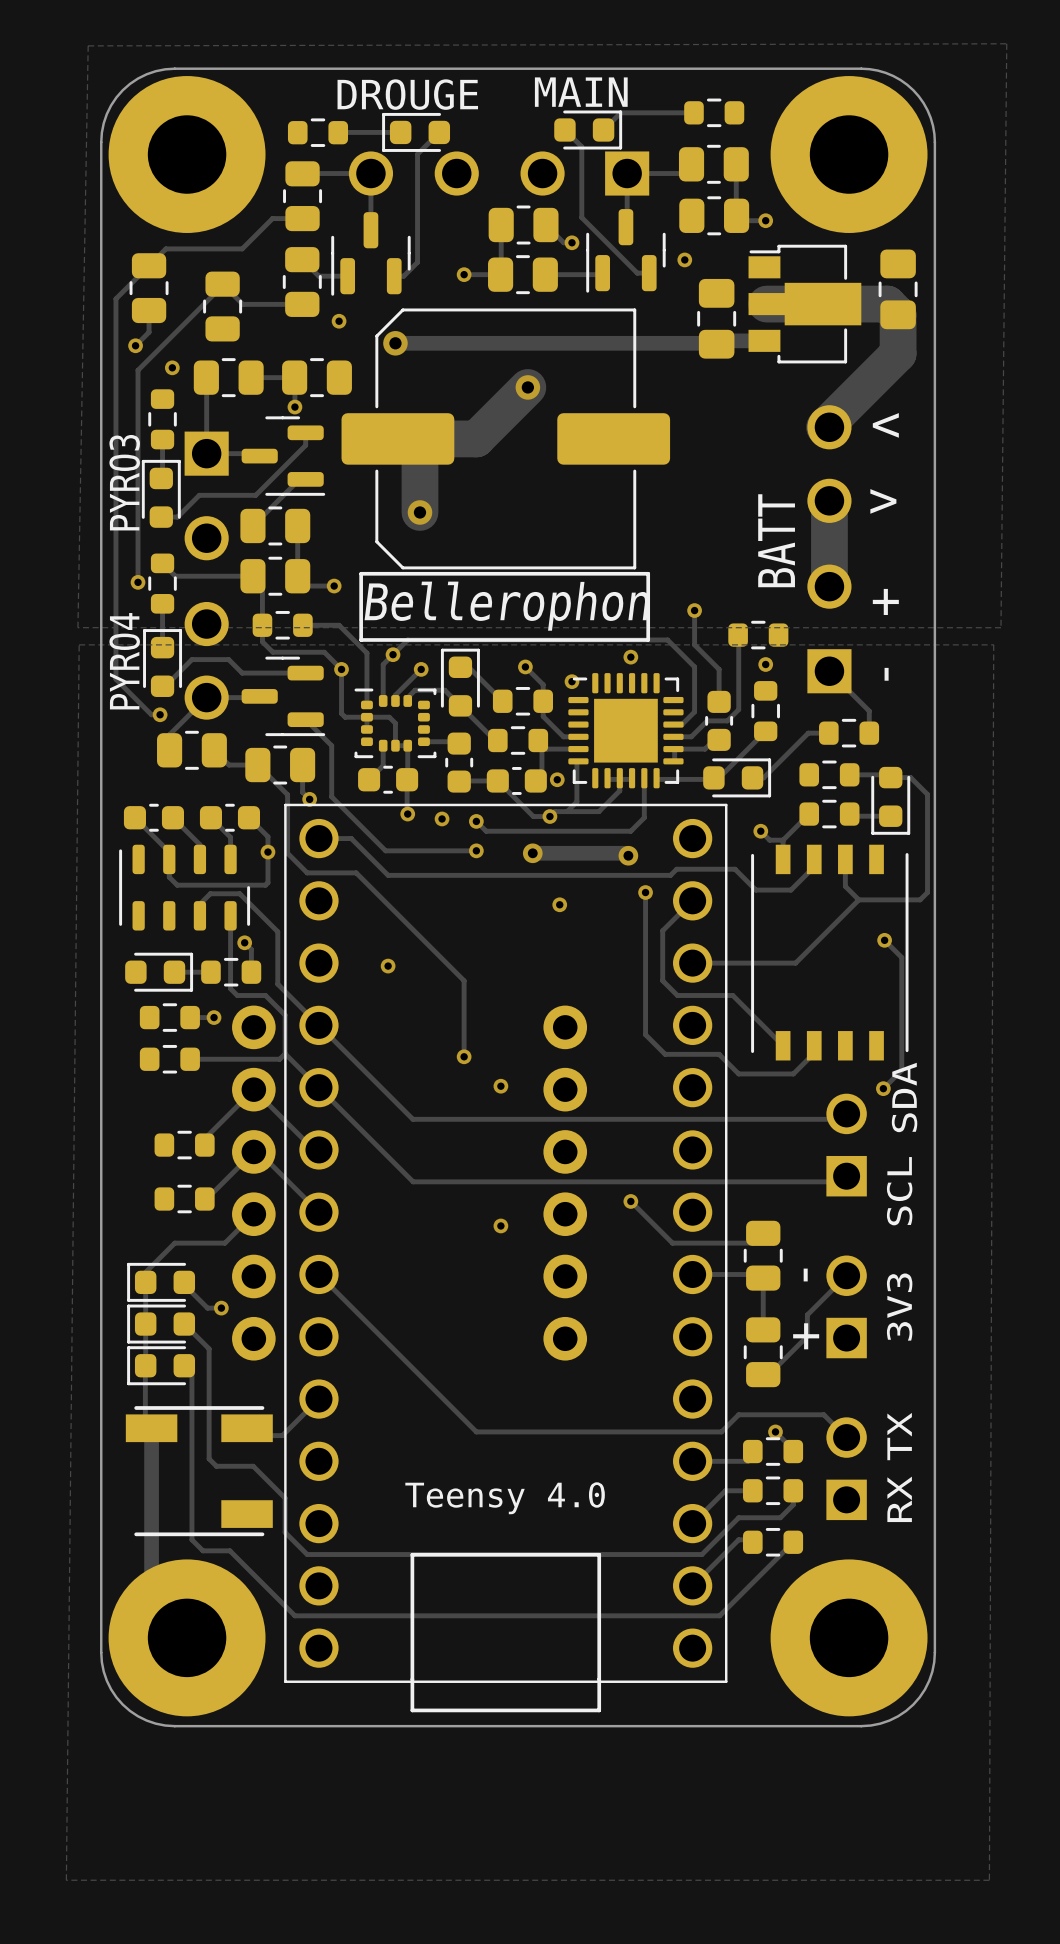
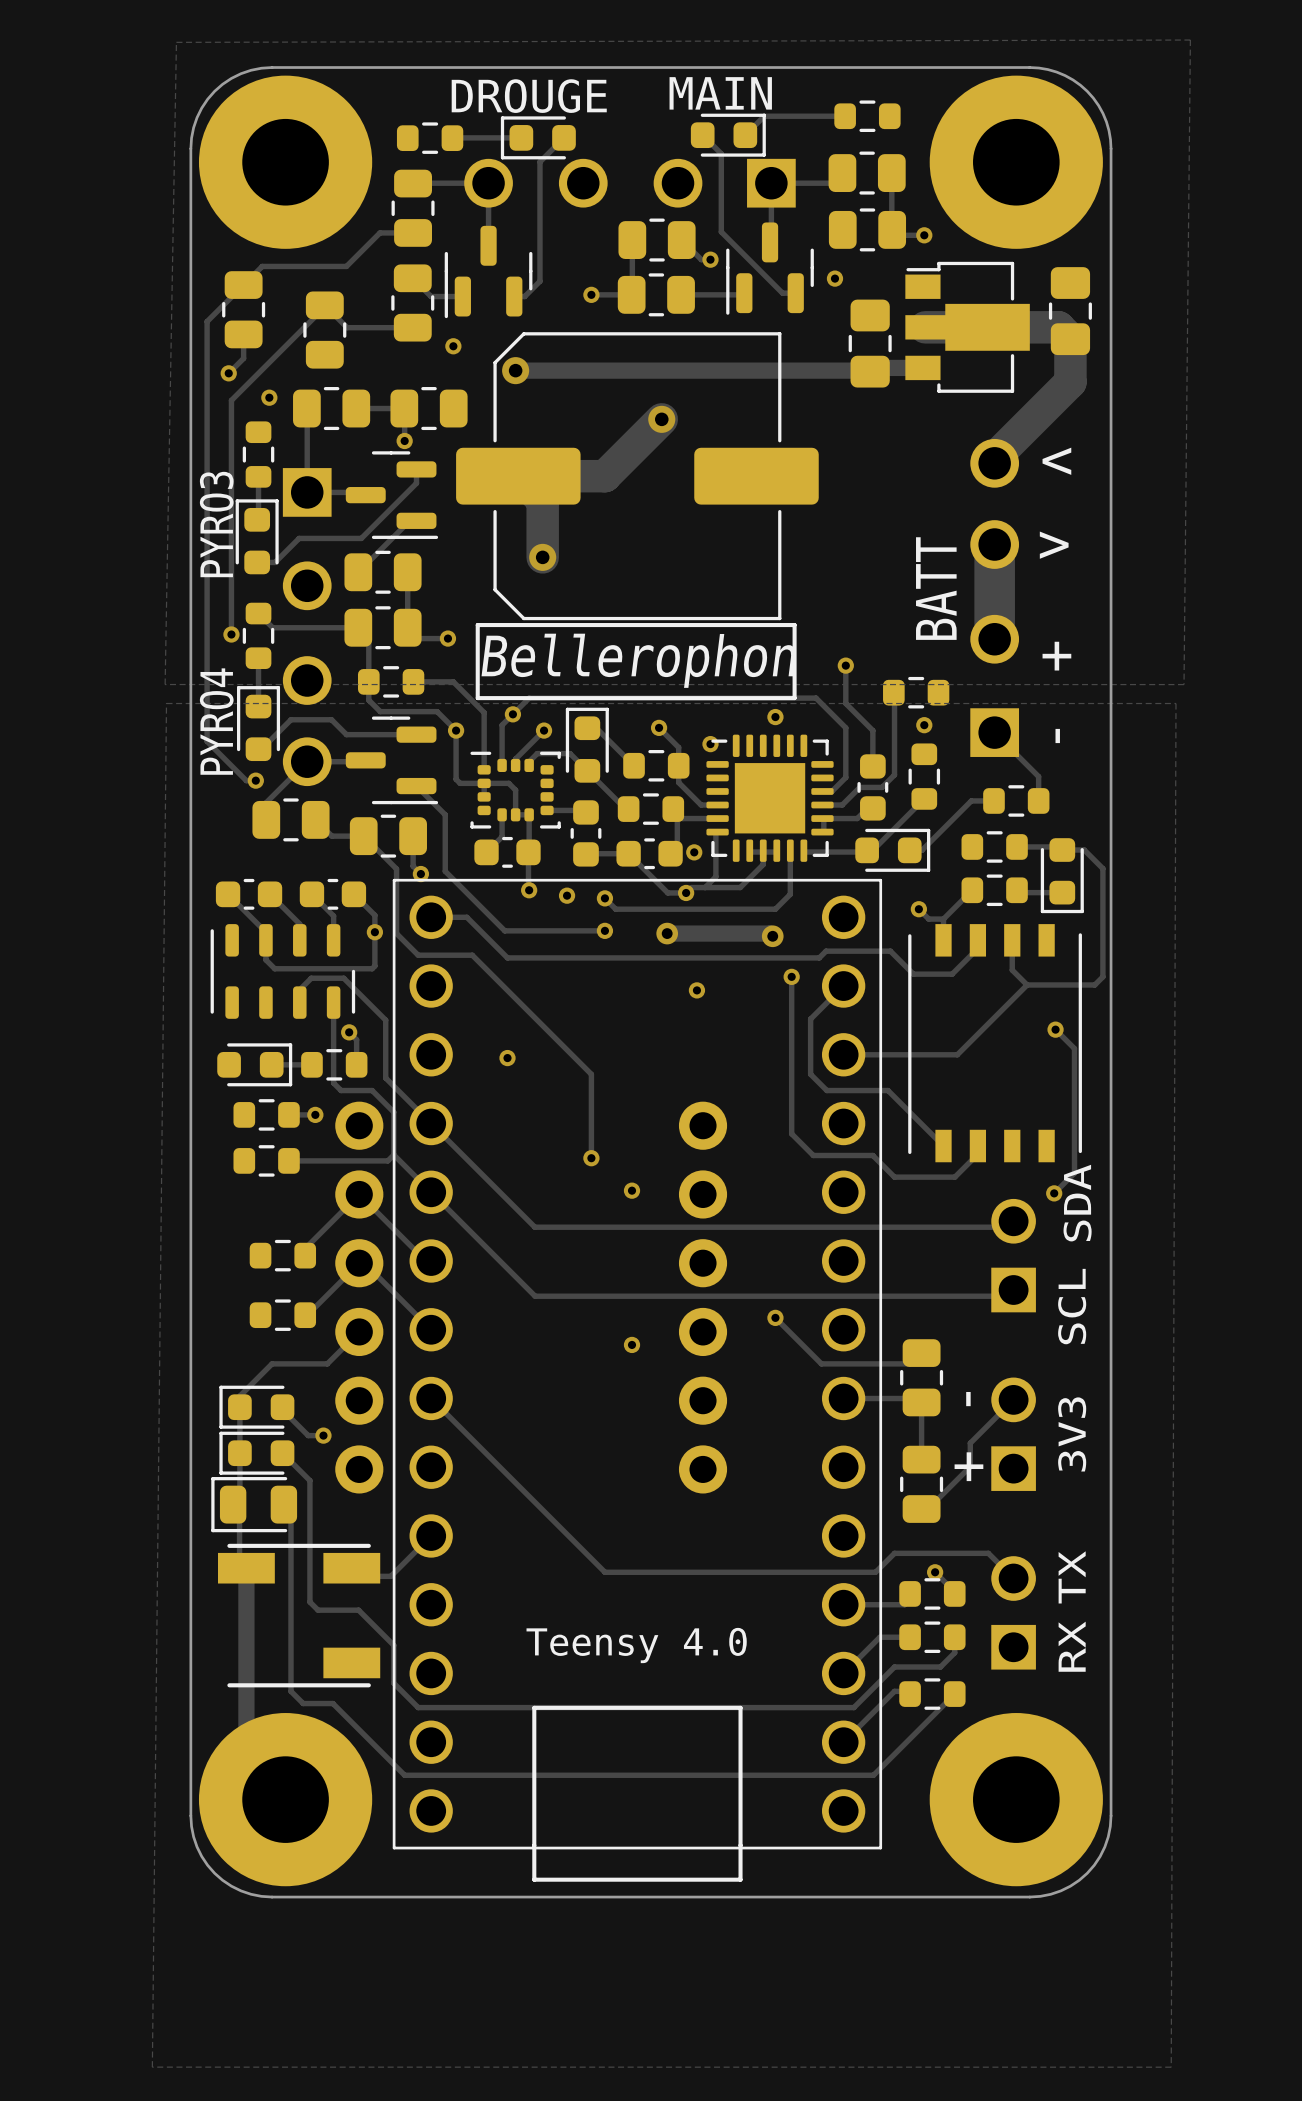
track width: thick (766, 304) (887, 304) (898, 314) (898, 353) (824, 427) -> thin (925, 327) (1058, 327) (1070, 339) (1070, 382) (989, 463)
track width: thick (527, 387) (476, 438) (397, 438) -> thin (661, 419) (604, 476) (518, 476)
track width: thick (419, 460) (419, 512) -> thin (542, 500) (542, 557)
part footprint: [127, 1346, 196, 1386] -> [211, 1477, 298, 1533]

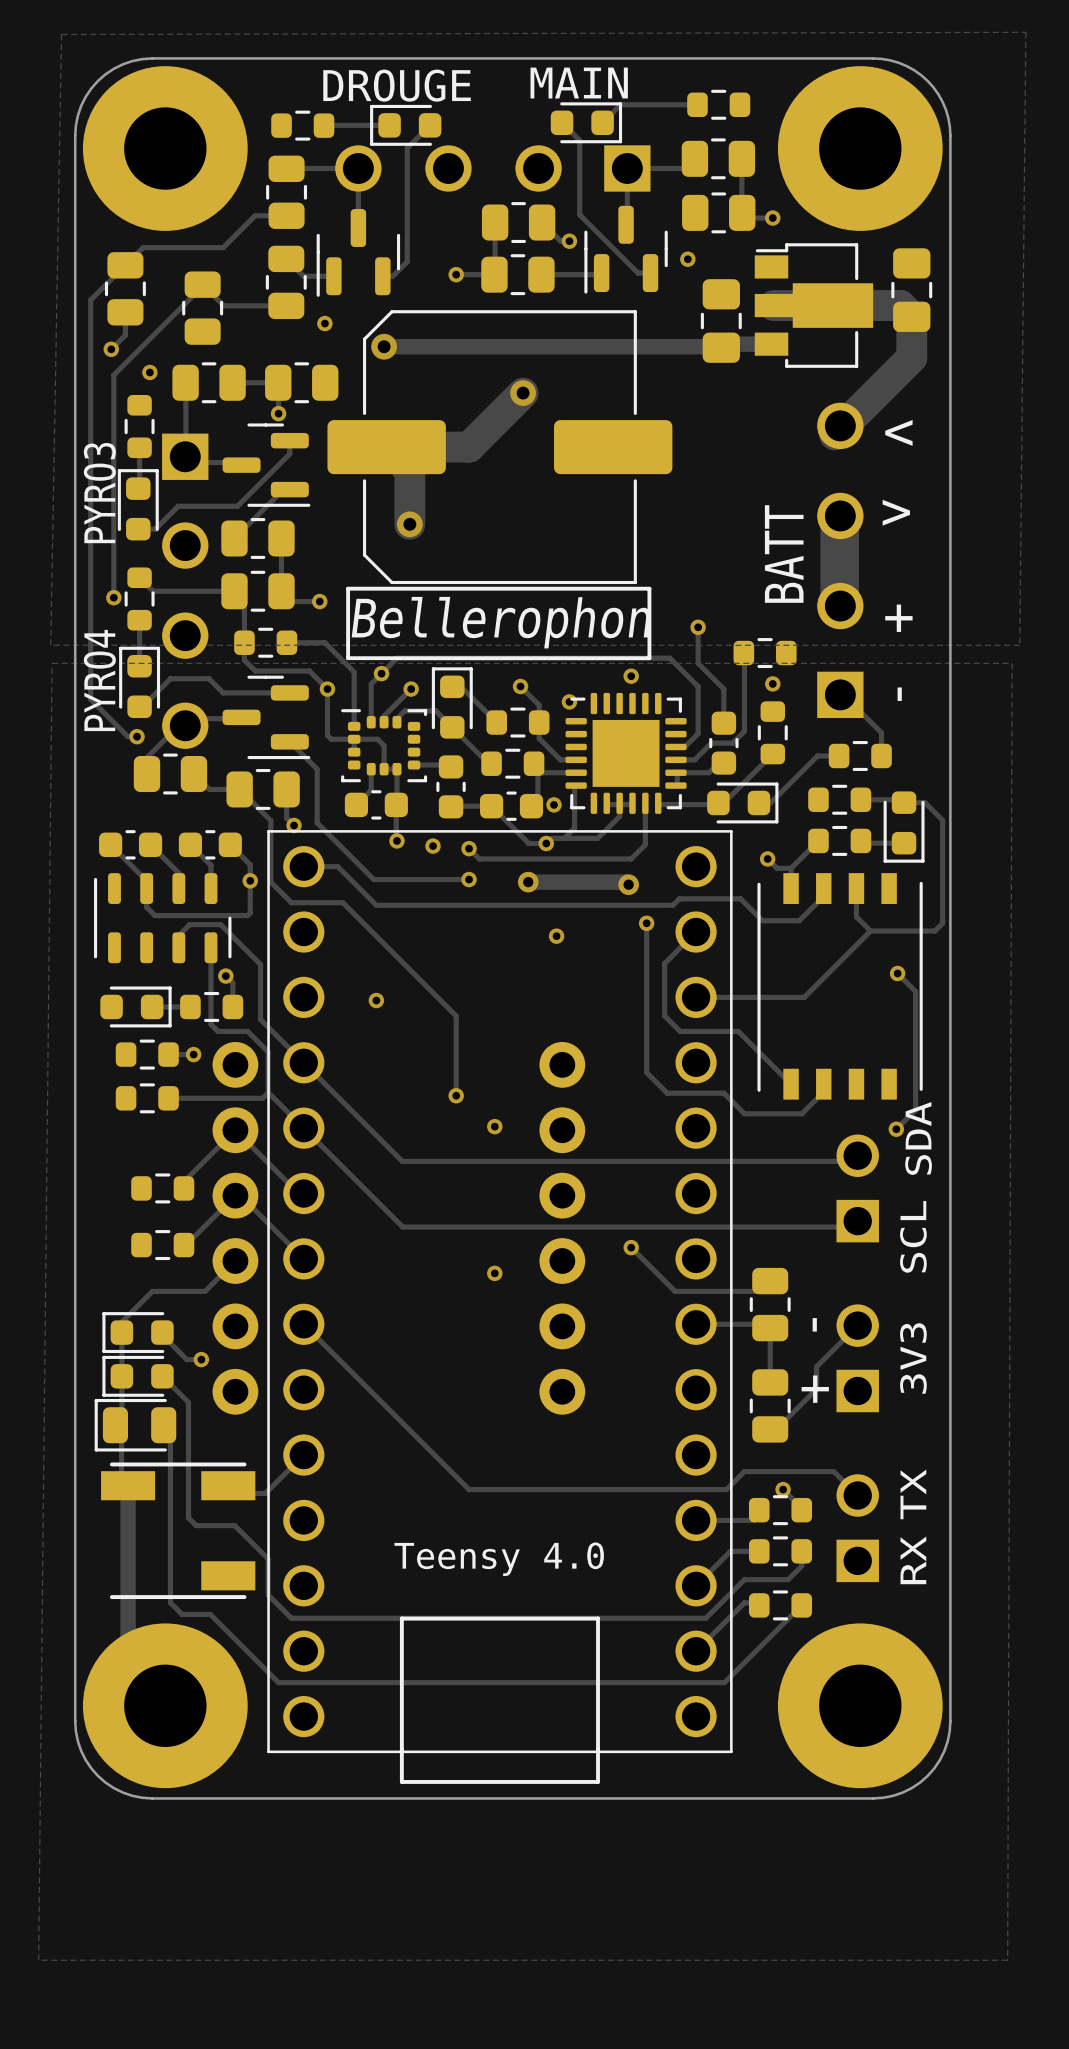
part footprint: [970, 438, 1020, 757] -> [817, 402, 864, 719]
part footprint: [282, 468, 332, 787] -> [162, 433, 209, 749]

